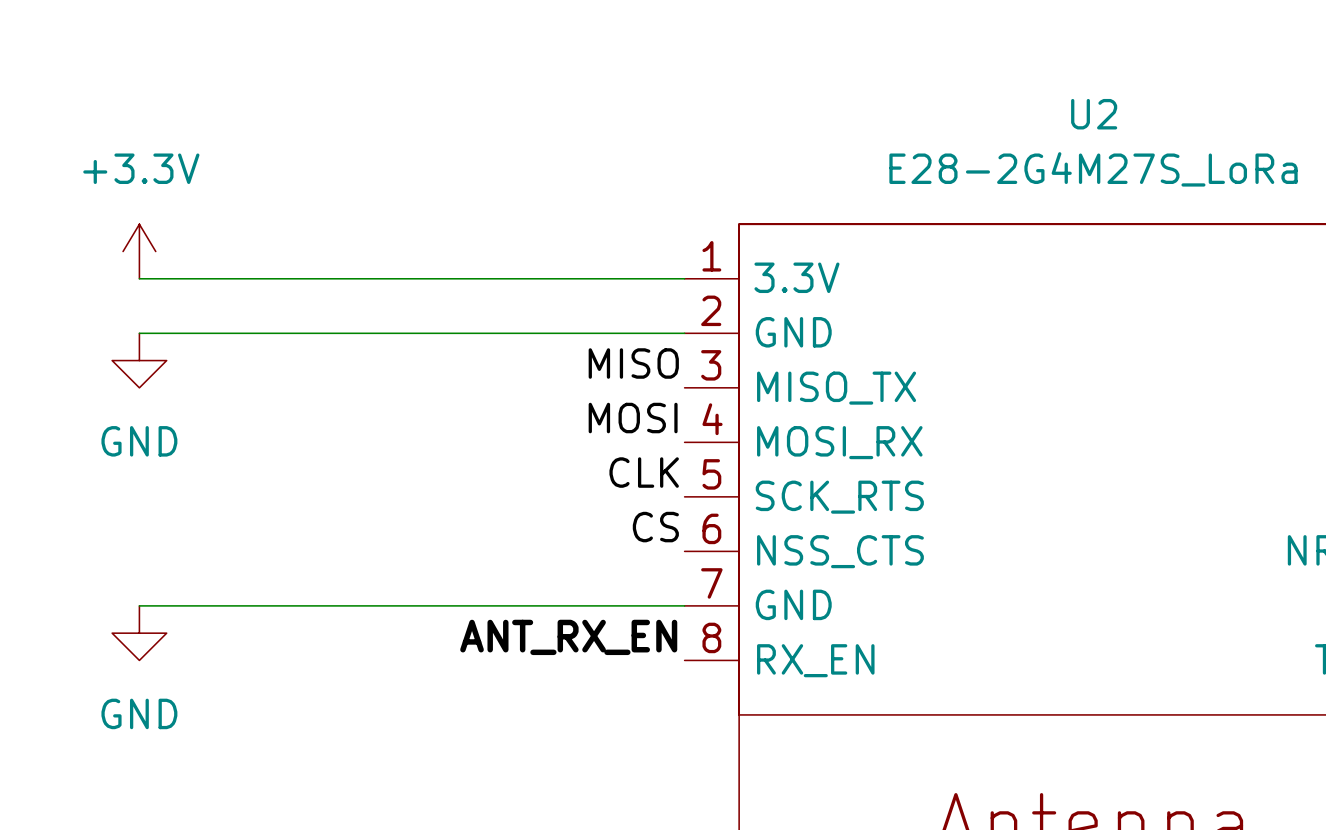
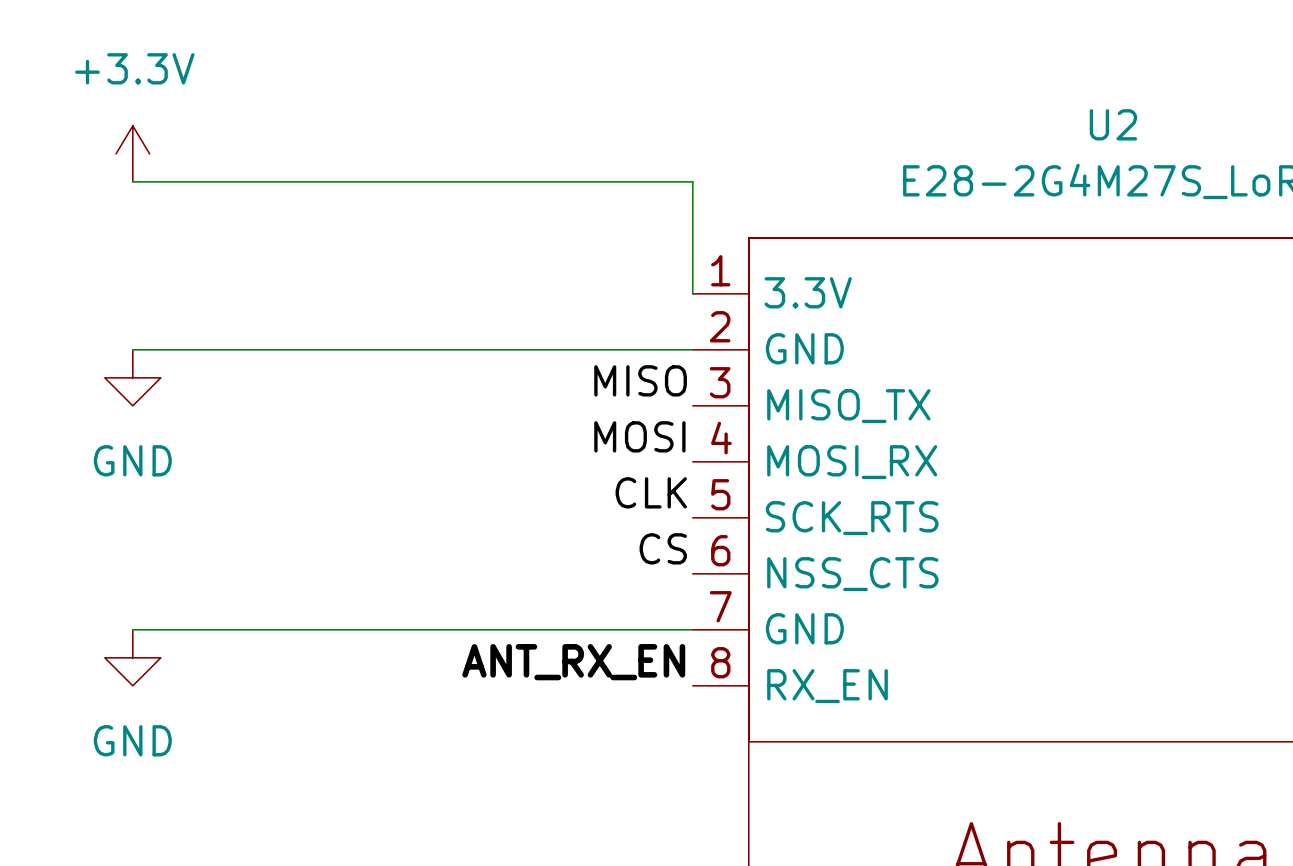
power symbol position: +3.3V (139, 251) -> +3.3V (132, 153)
wire: (139, 278) (684, 278) -> (132, 181) (692, 181) (692, 293)

